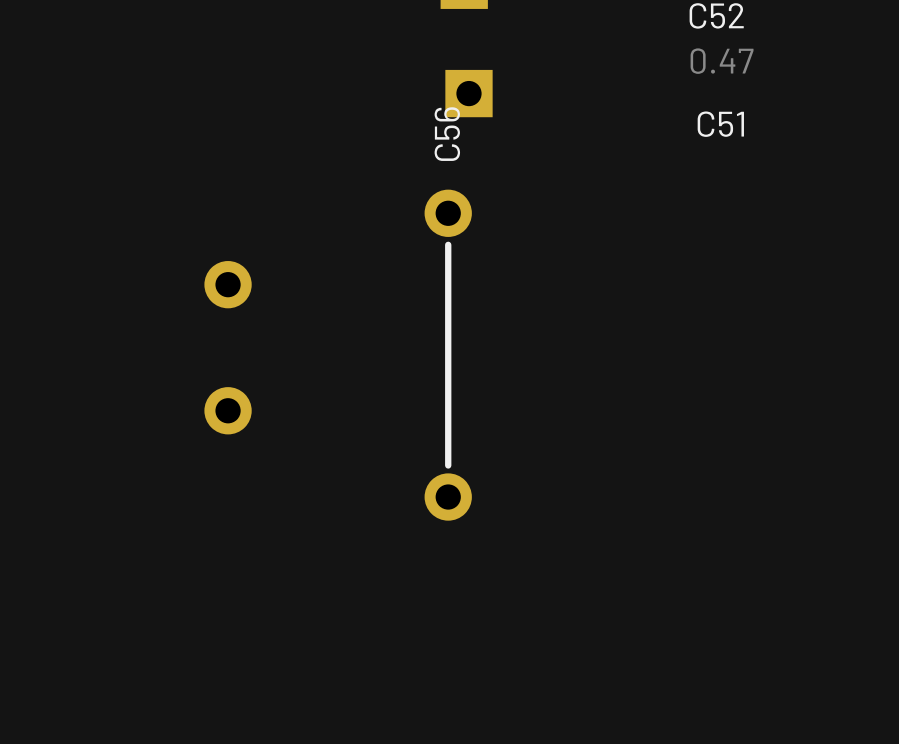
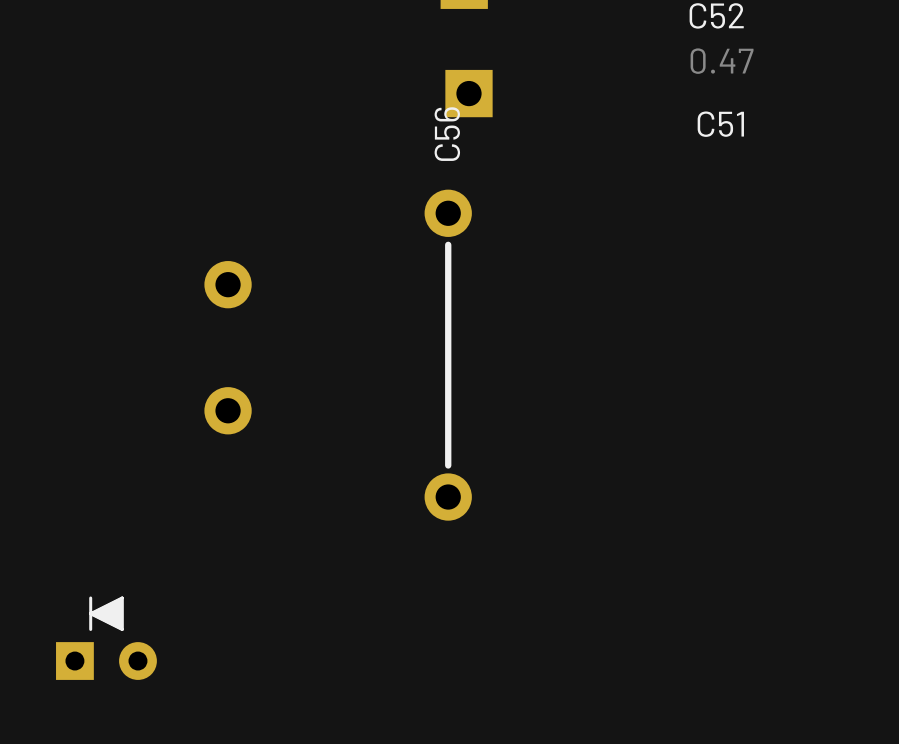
part: none -> (106, 638)

